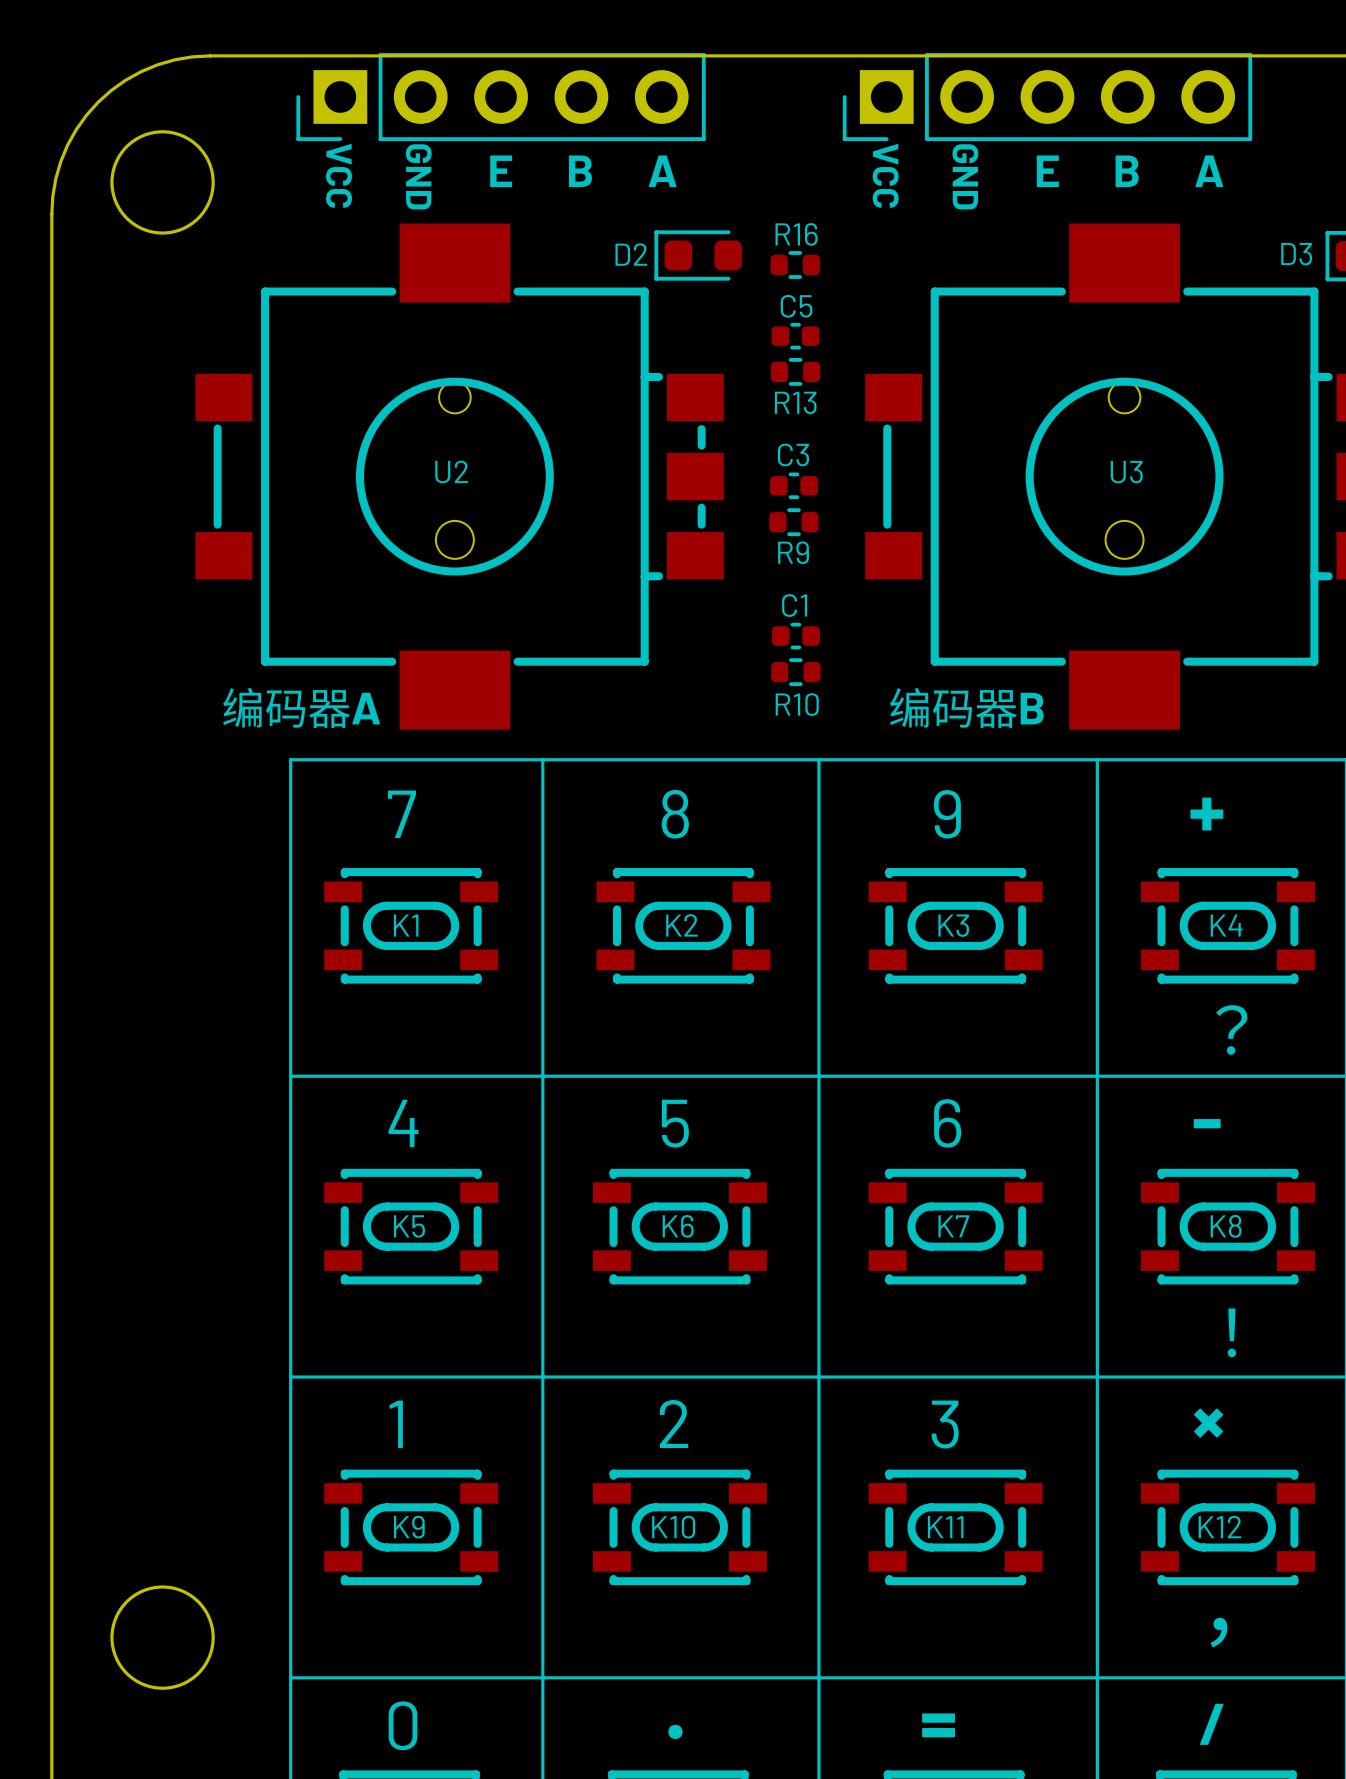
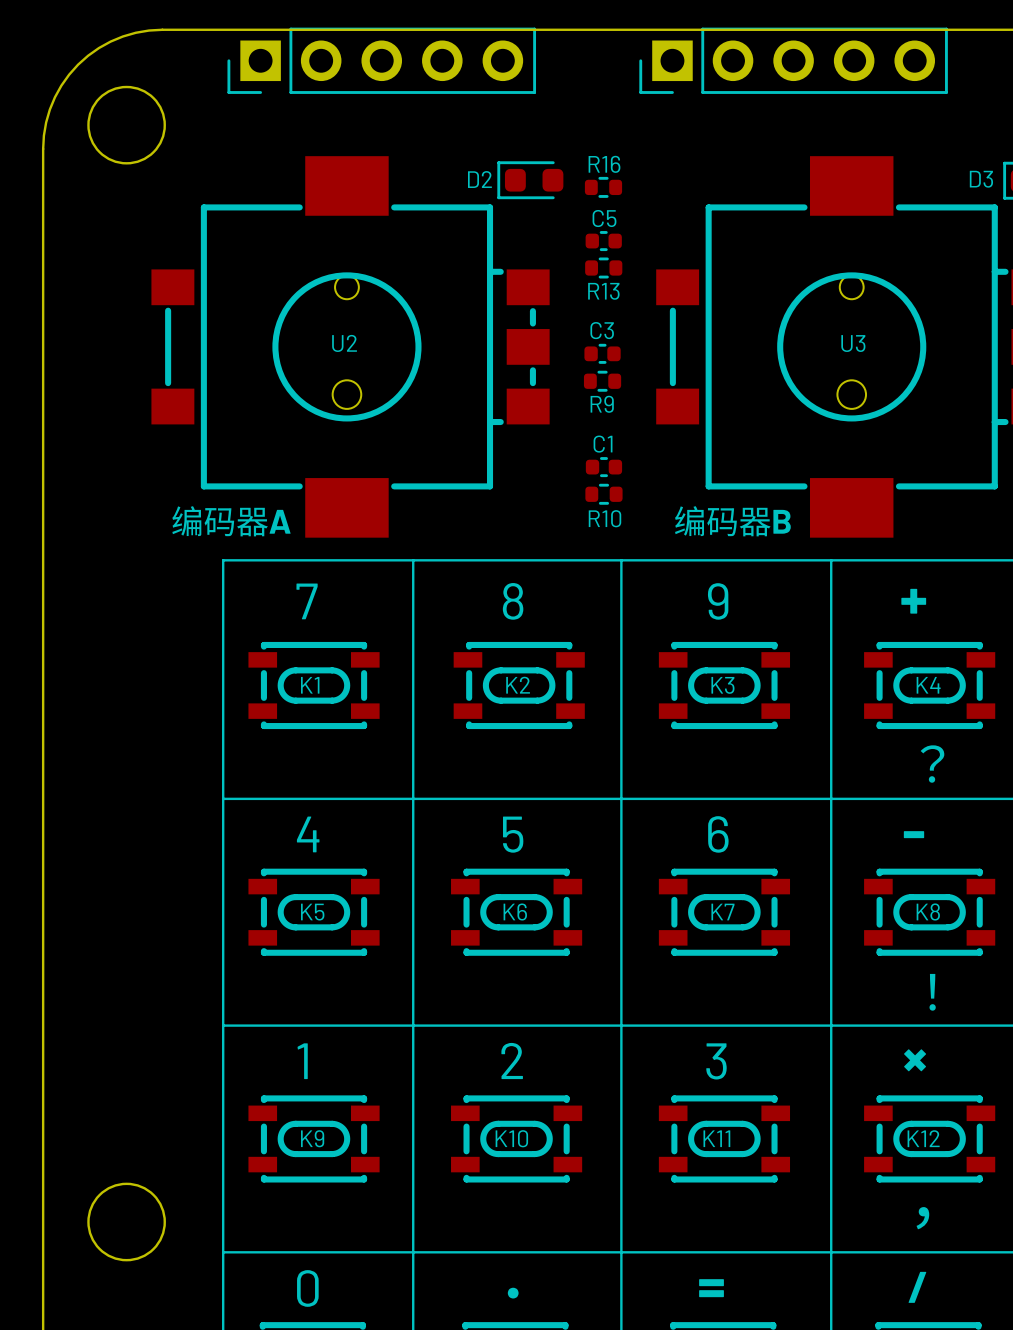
text: E (501, 171) -> none
text: B (580, 171) -> none
text: A (662, 171) -> none
text: E (1047, 171) -> none
text: B (1127, 171) -> none
text: A (1209, 171) -> none
text: VCC (339, 175) -> none
text: VCC (885, 175) -> none
text: GND (418, 176) -> none
text: GND (965, 176) -> none

